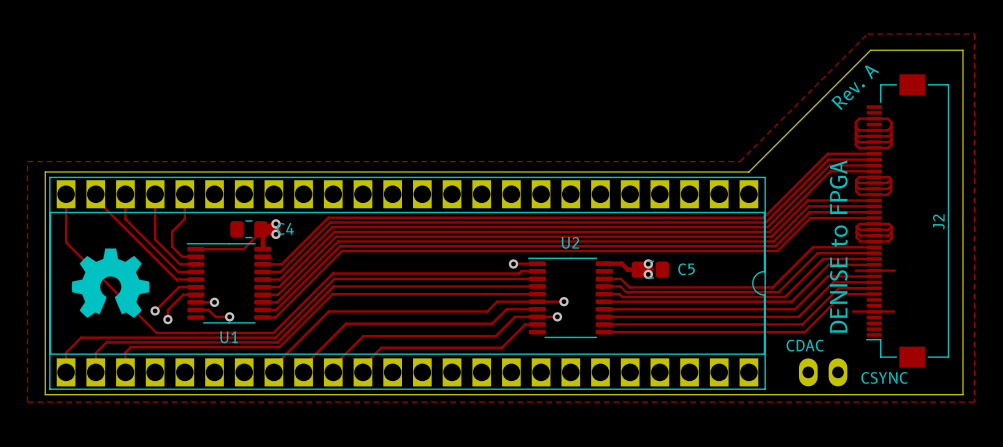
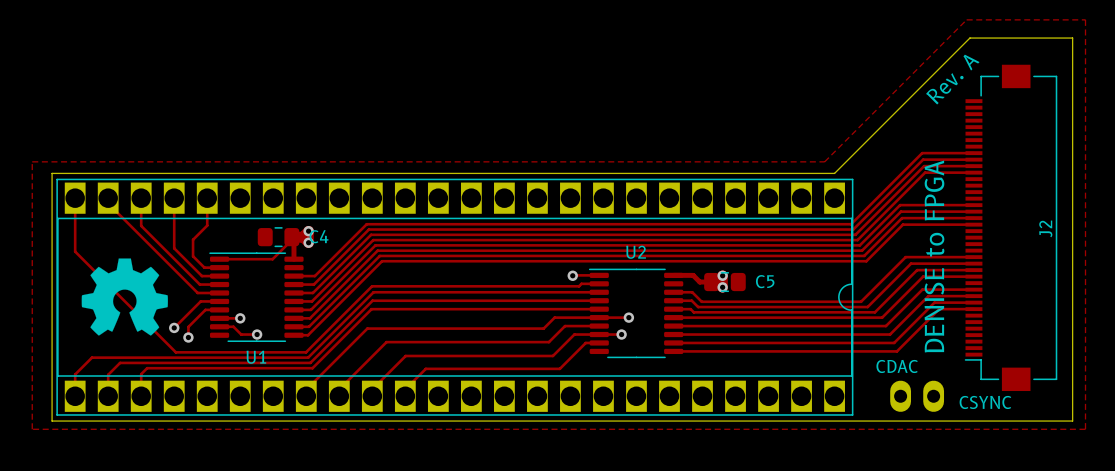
track: (859, 118) (888, 118) (891, 122) (891, 144) (888, 147) (858, 147) (855, 144) (855, 122) (859, 118) -> none
track: (891, 126) (887, 130) (859, 130) (855, 126) -> none
track: (855, 133) (858, 136) (888, 136) (891, 133) -> none
track: (855, 139) (858, 142) (888, 142) (891, 139) -> none
track: (891, 179) (889, 177) (859, 177) (856, 180) -> none
track: (891, 179) (887, 182) (858, 182) (856, 180) -> none
track: (891, 179) (891, 191) (887, 194) (859, 194) (856, 191) (856, 180) -> none
track: (856, 185) (859, 188) (887, 188) (891, 185) -> none
track: (856, 226) (859, 223) (889, 223) (891, 226) -> none
track: (856, 226) (859, 229) (888, 229) (891, 226) -> none
track: (856, 226) (856, 237) (860, 241) (888, 241) (891, 238) (891, 226) -> none
track: (856, 231) (860, 235) (888, 235) (891, 232) -> none
track: (855, 270) (894, 270) -> none
track: (852, 311) (894, 311) -> none

